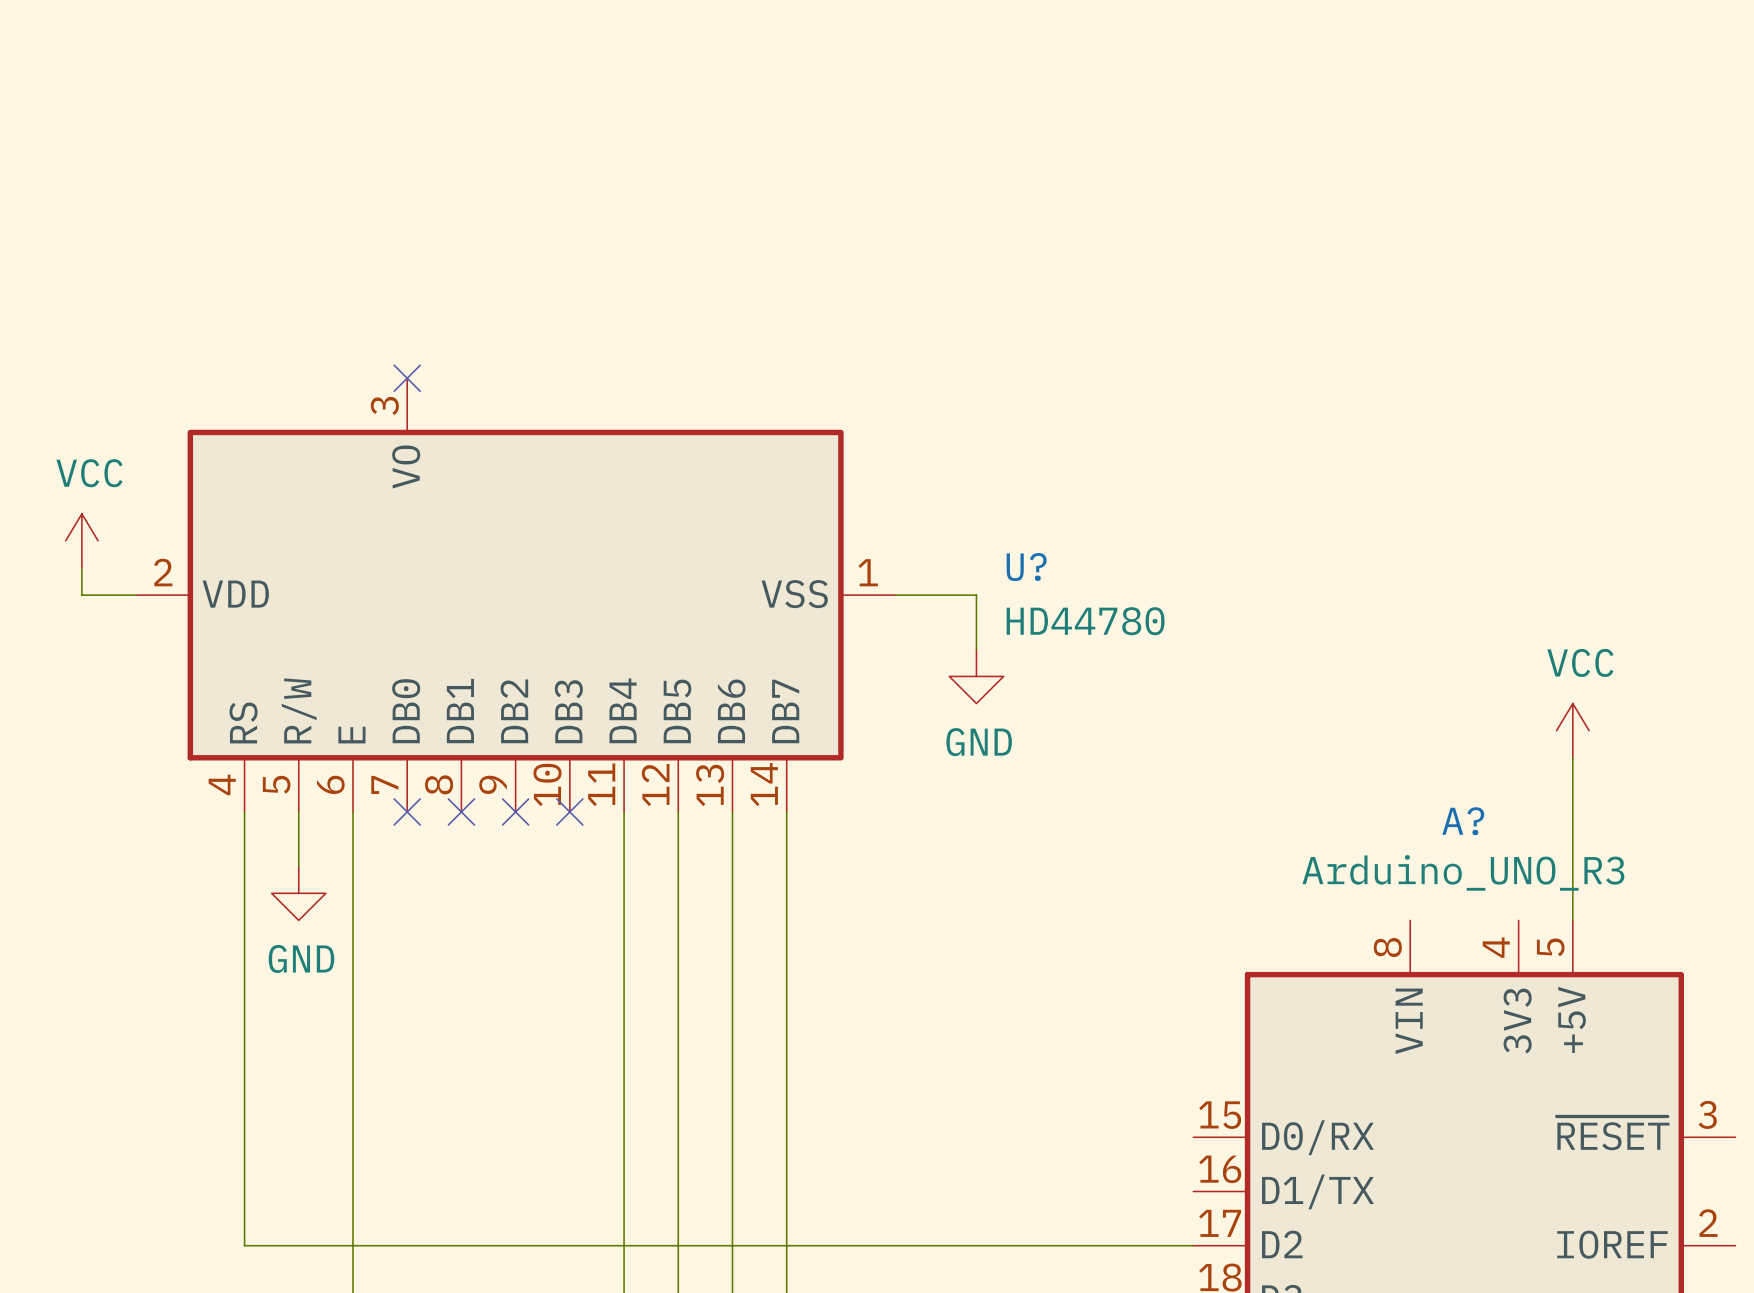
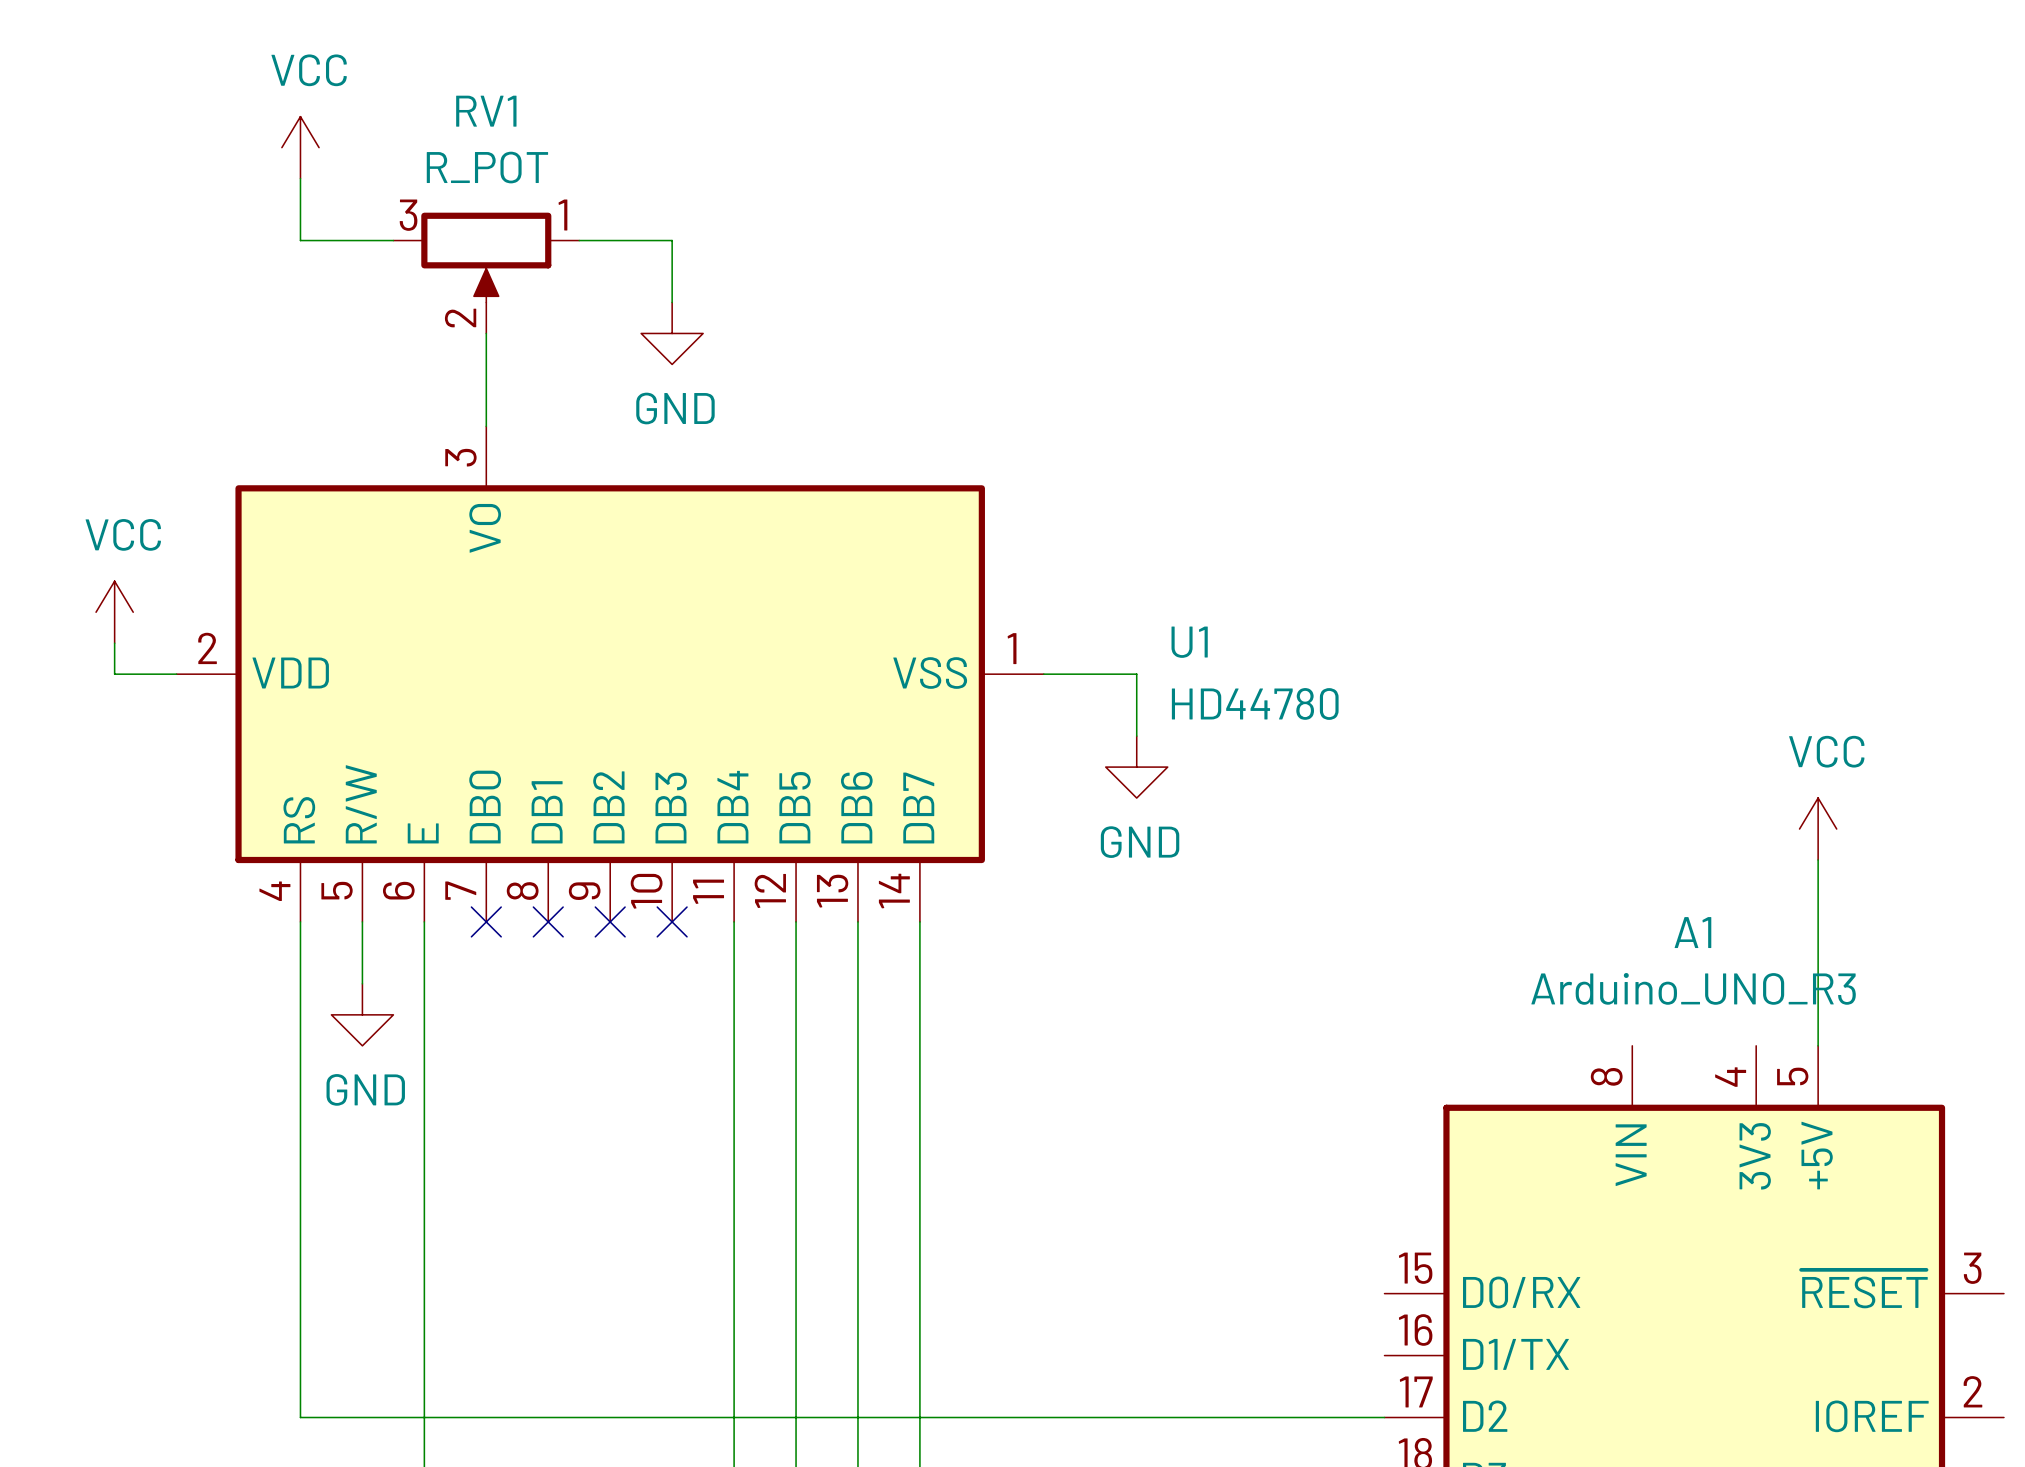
power symbol: none -> VCC (300, 147)
wire: none -> (300, 178) (300, 240) (393, 240)
wire: none -> (579, 240) (672, 240) (672, 302)
RV1: none -> R_POT (486, 273)
wire: none -> (486, 333) (486, 426)
power symbol: none -> GND (672, 333)
no-connect mark: (407, 378) -> none
U? name: U? (1026, 567) -> U1 (1189, 642)
A? name: A? (1463, 821) -> A1 (1692, 932)

